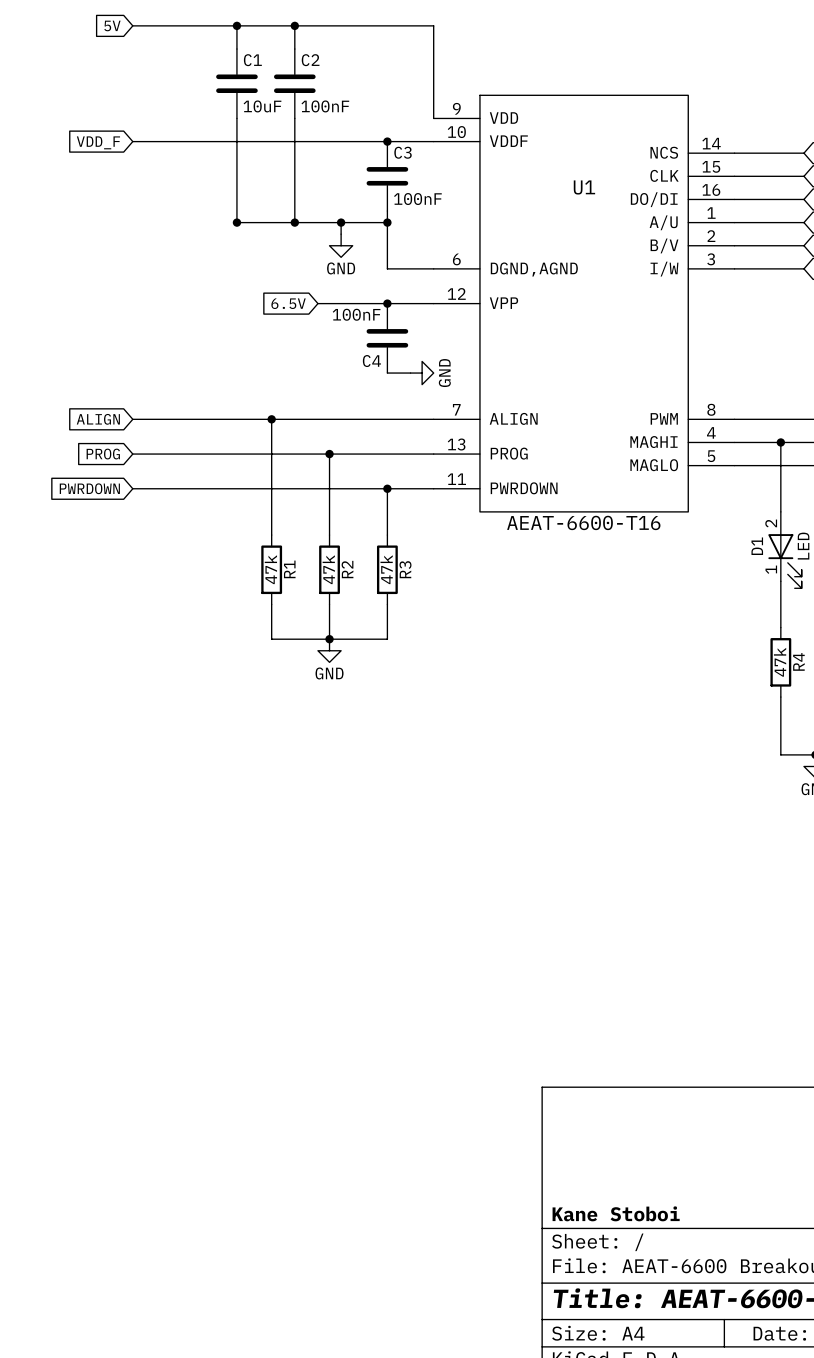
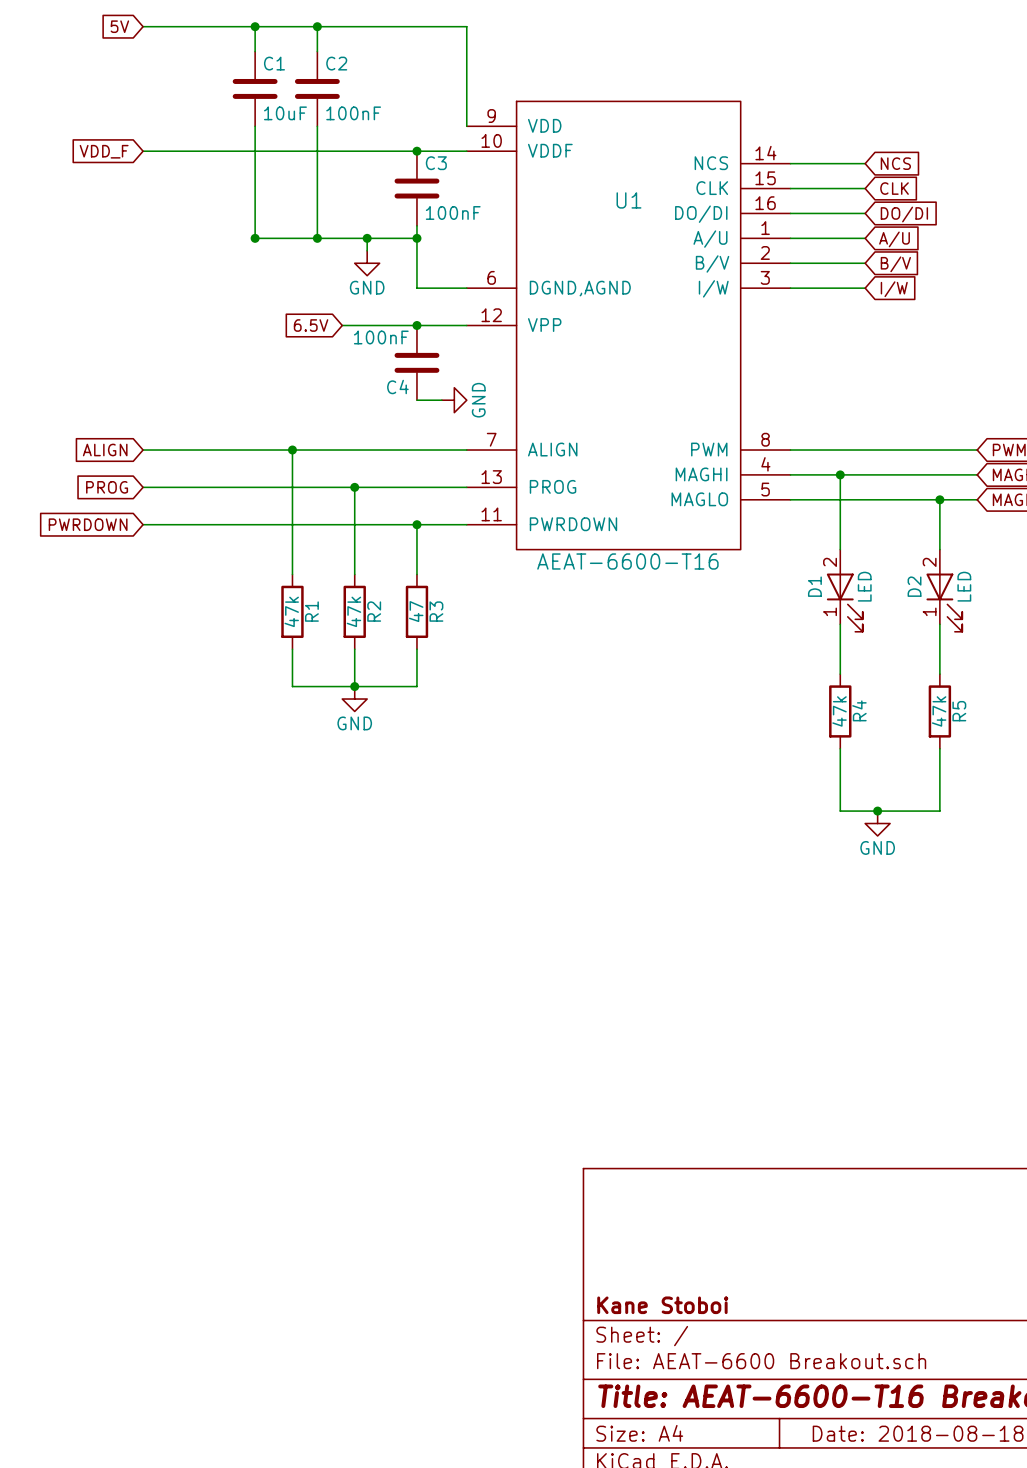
R3 value: 47k (386, 569) -> 47 (416, 611)

